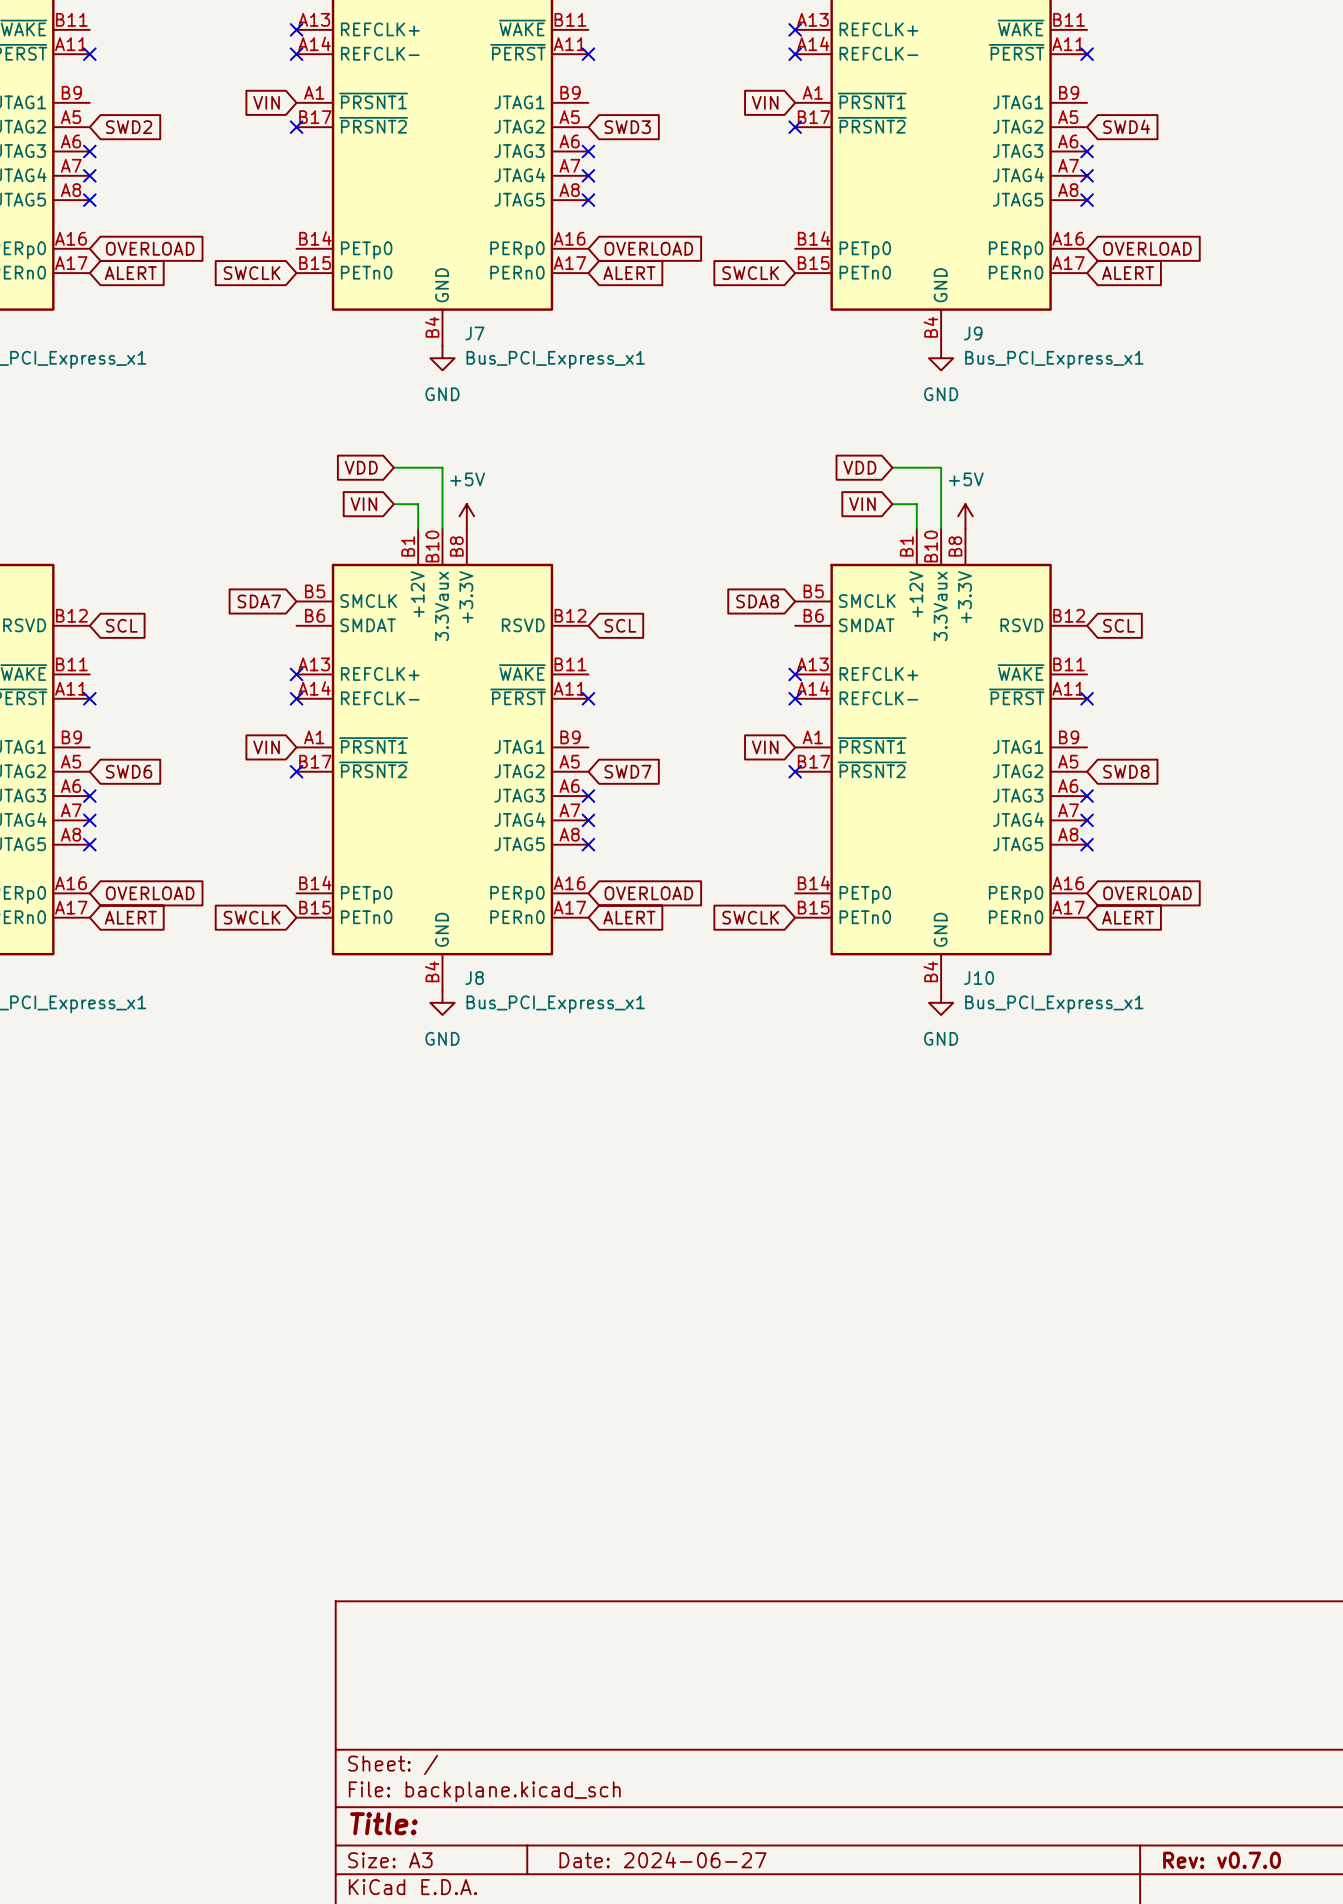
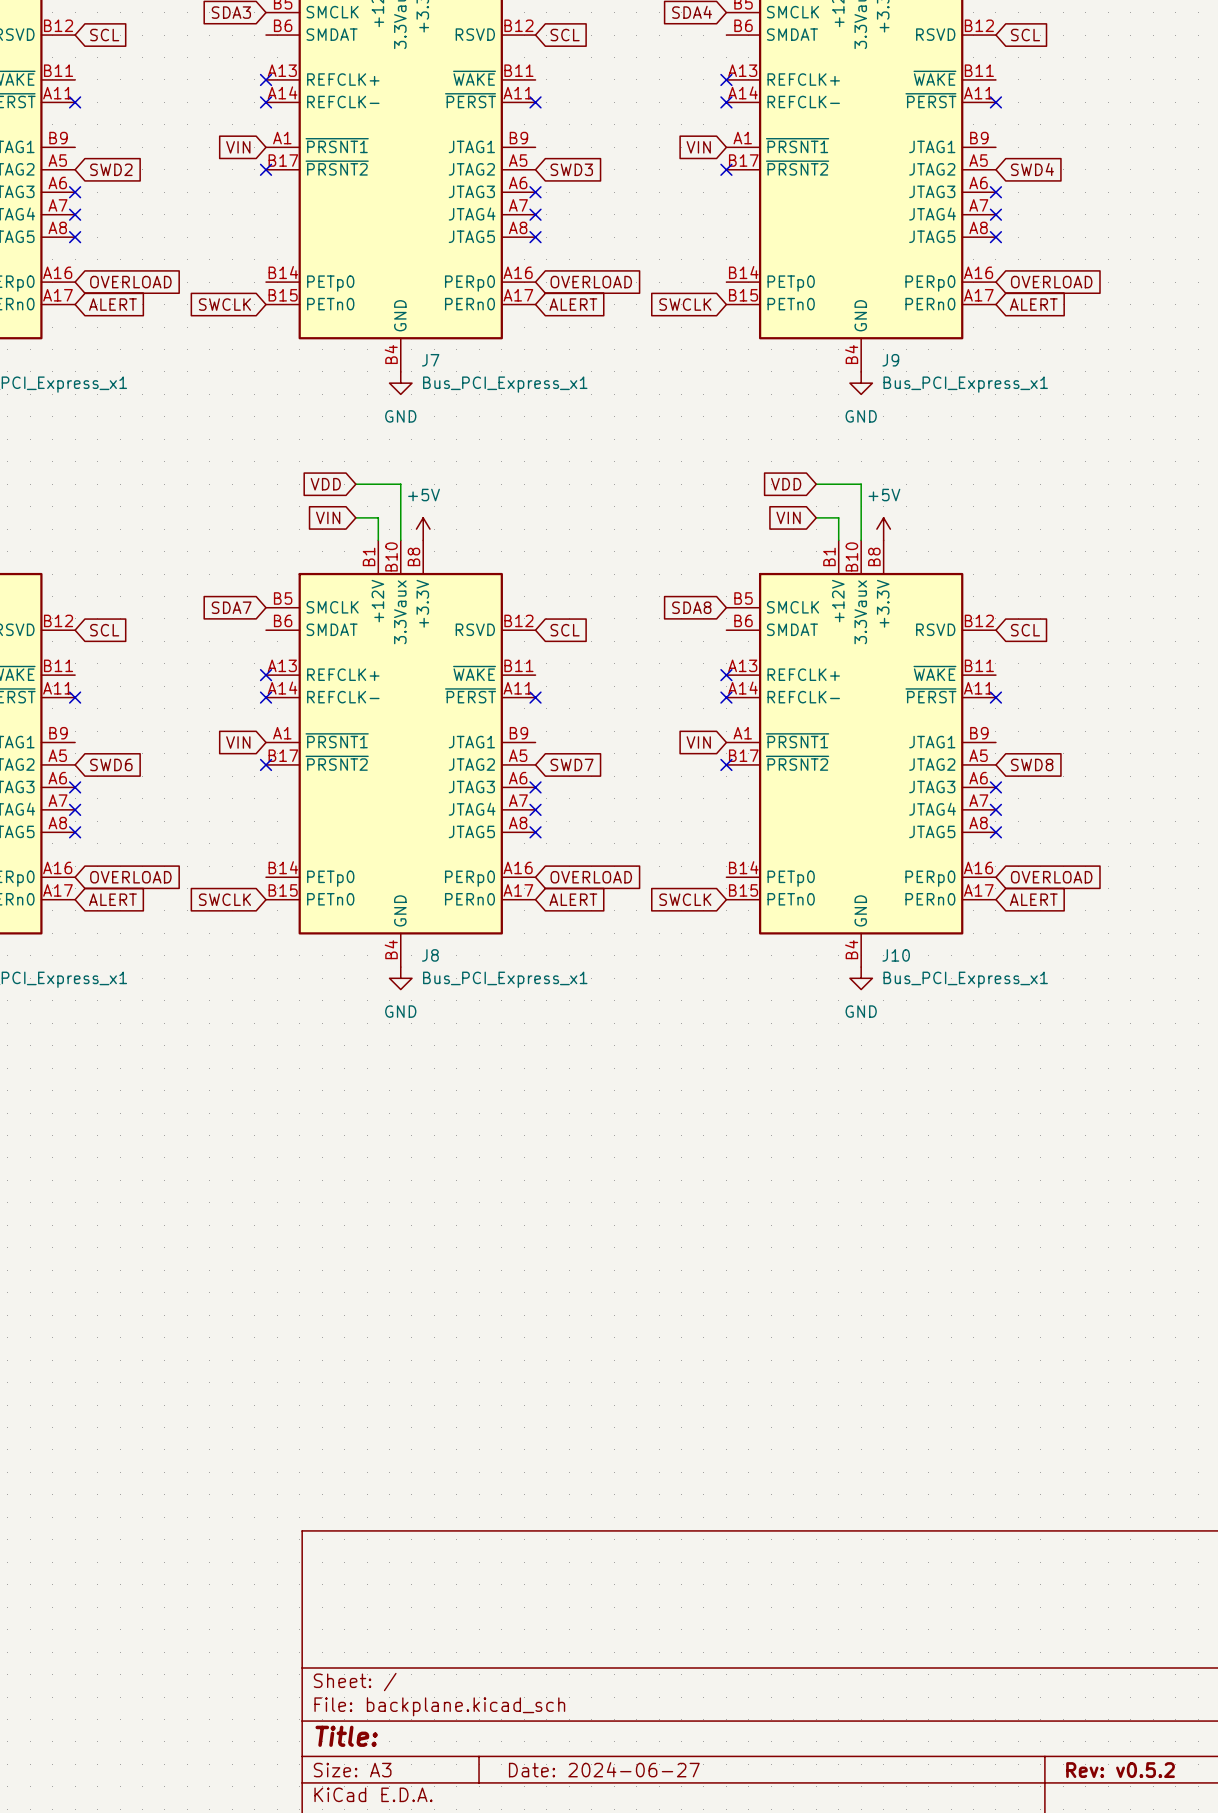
title block: Rev: v0.7.0 (1222, 1860) -> Rev: v0.5.2 (1120, 1770)

